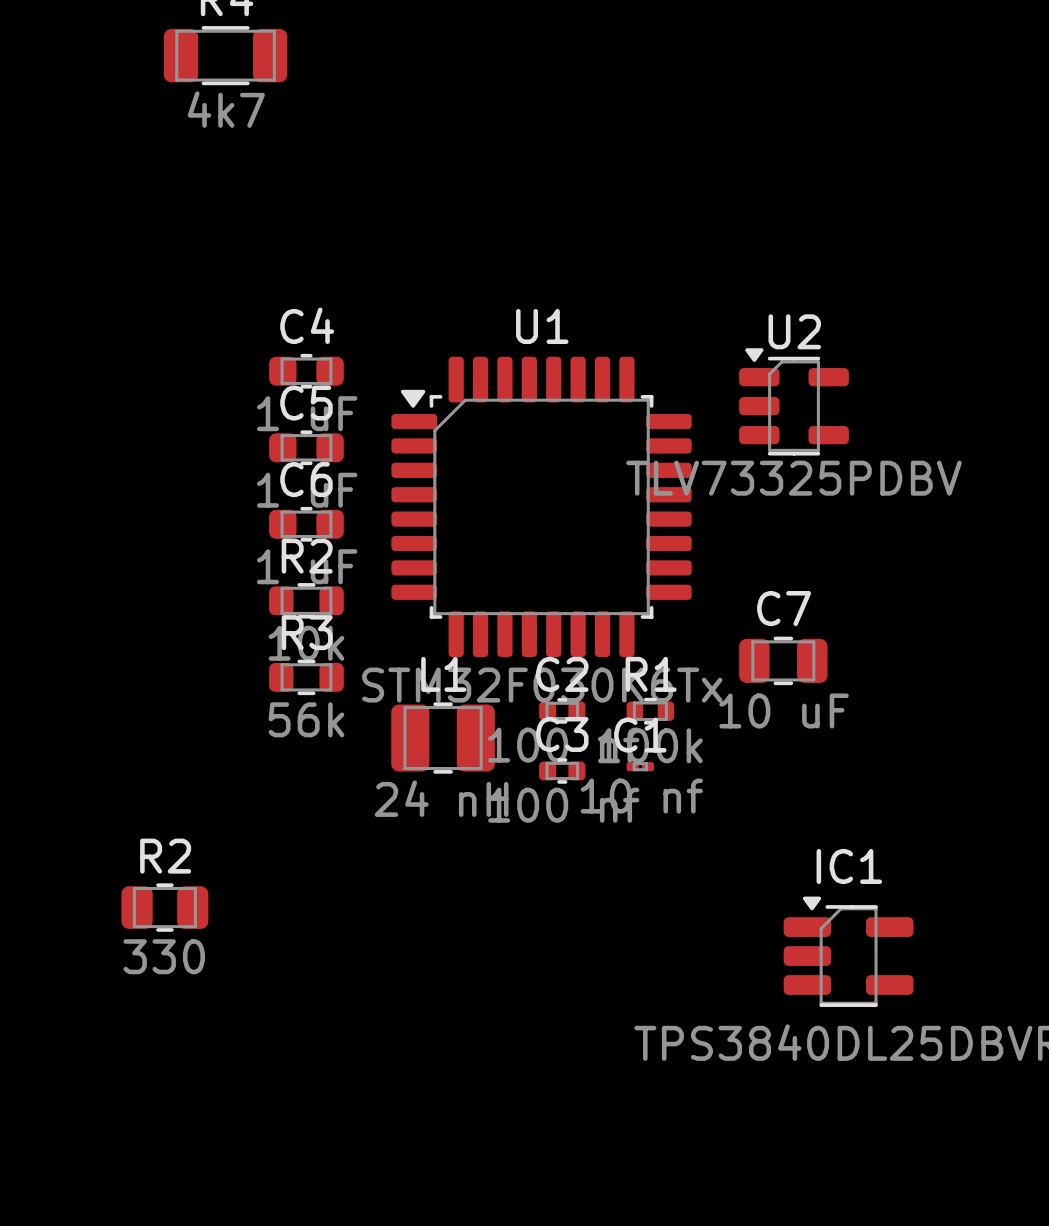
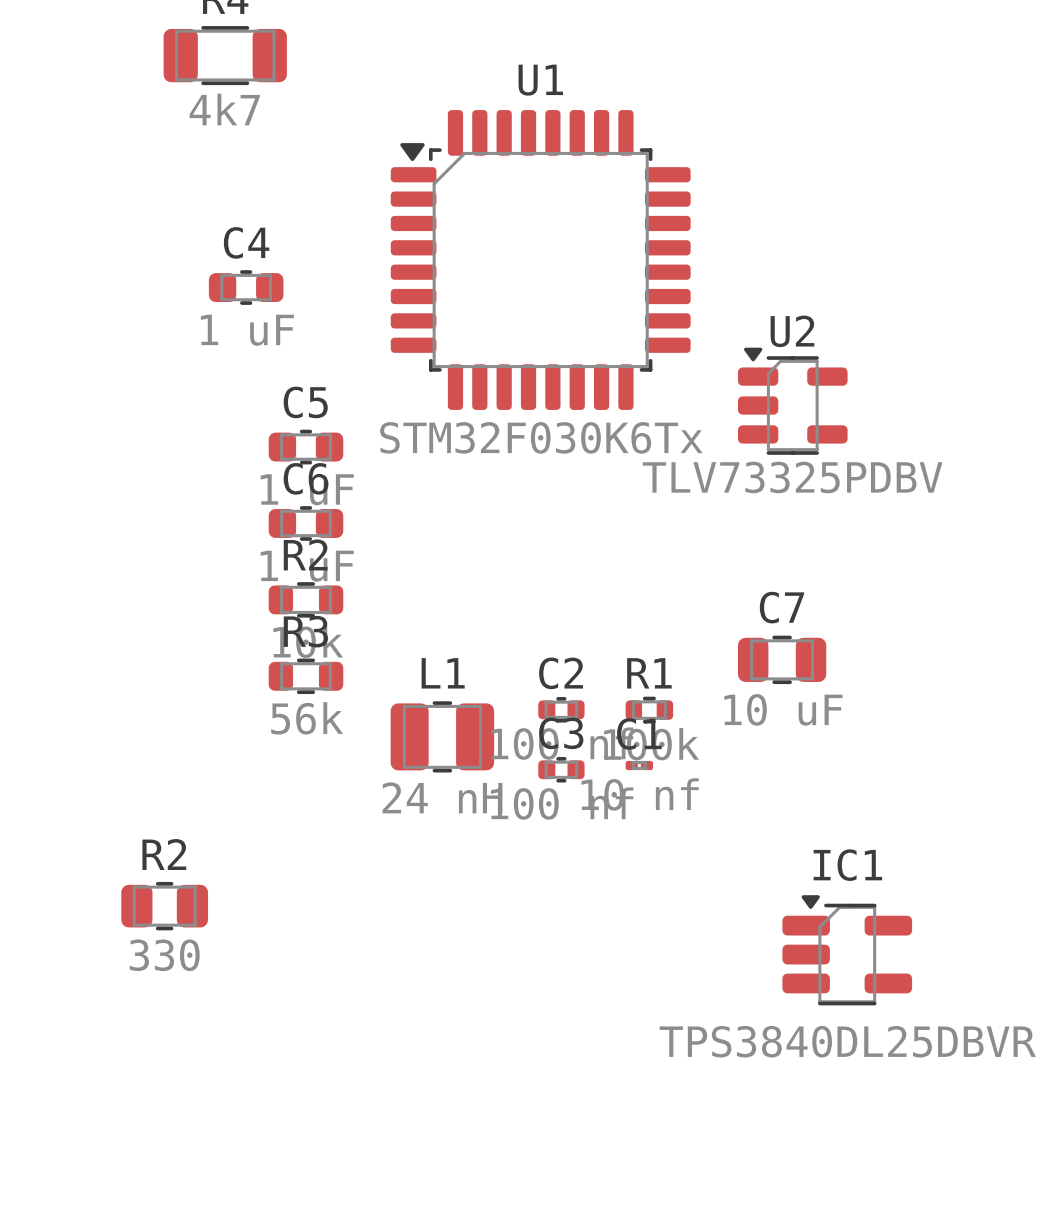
C4 position: (306, 371) -> (246, 287)
U1 position: (541, 506) -> (540, 259)

